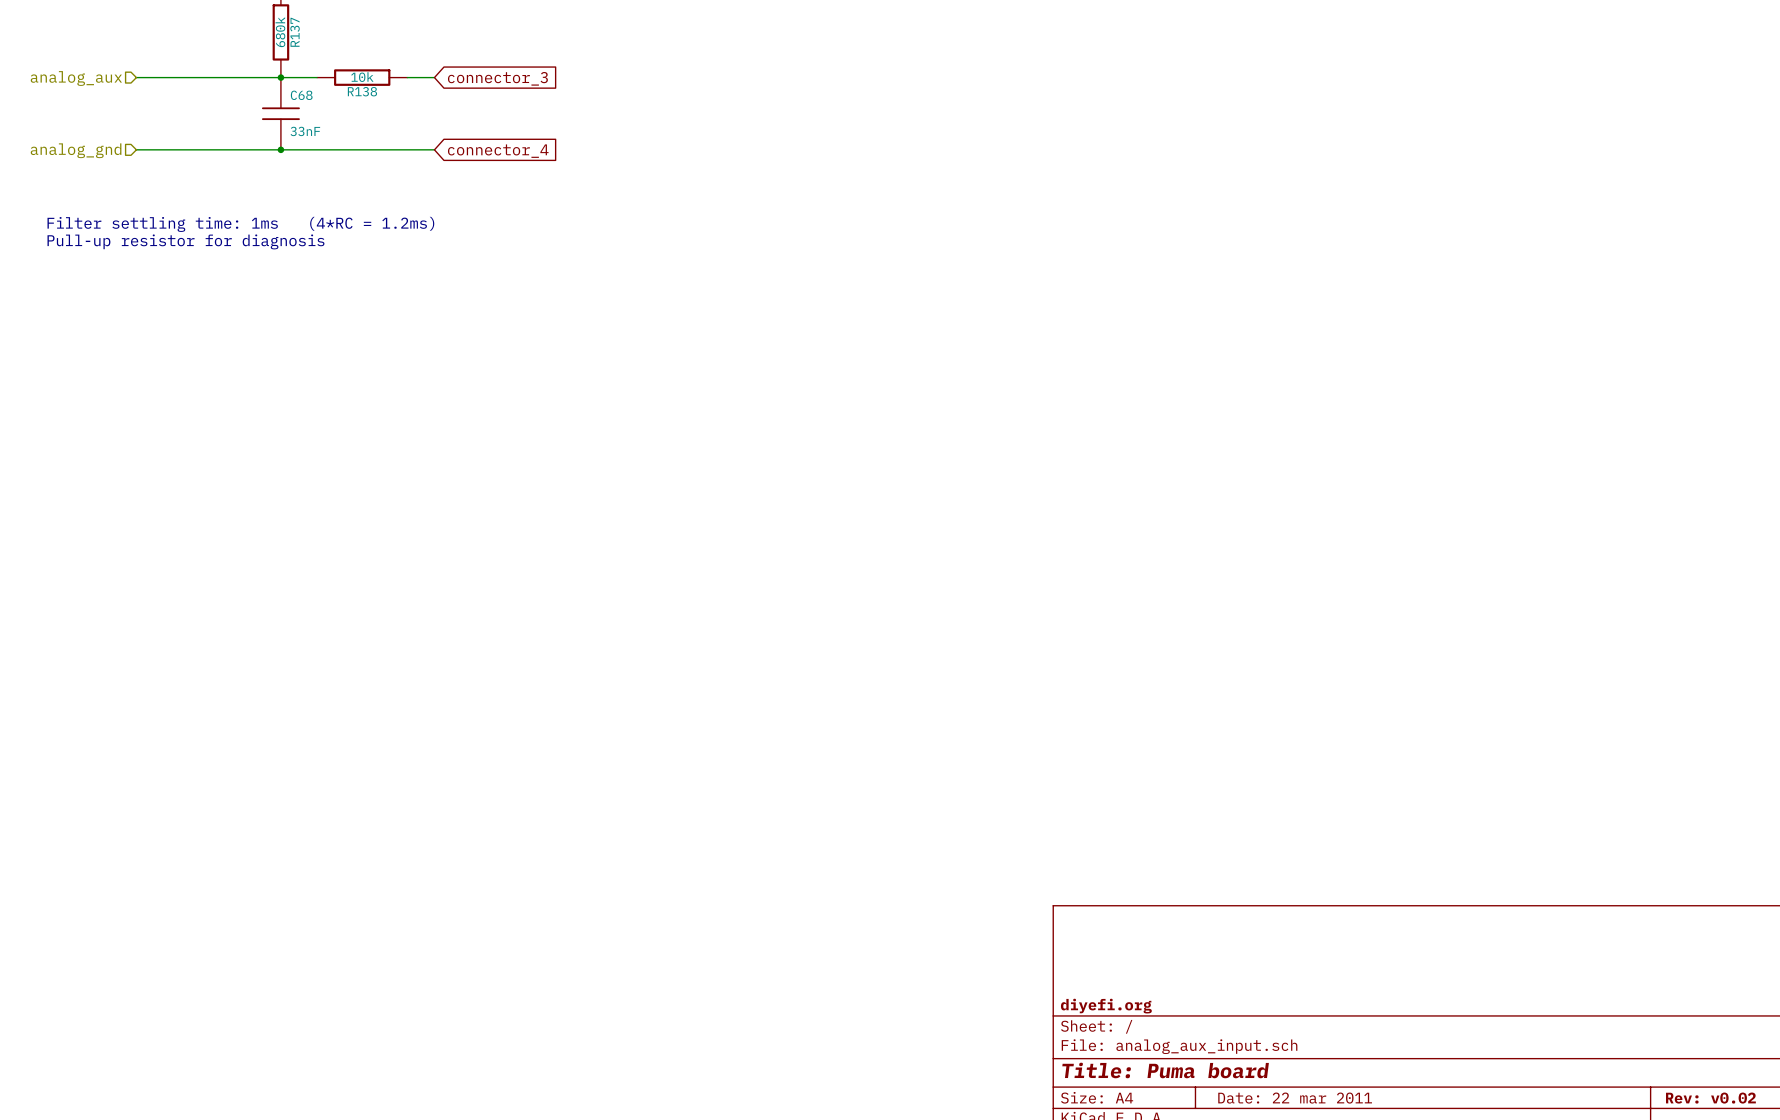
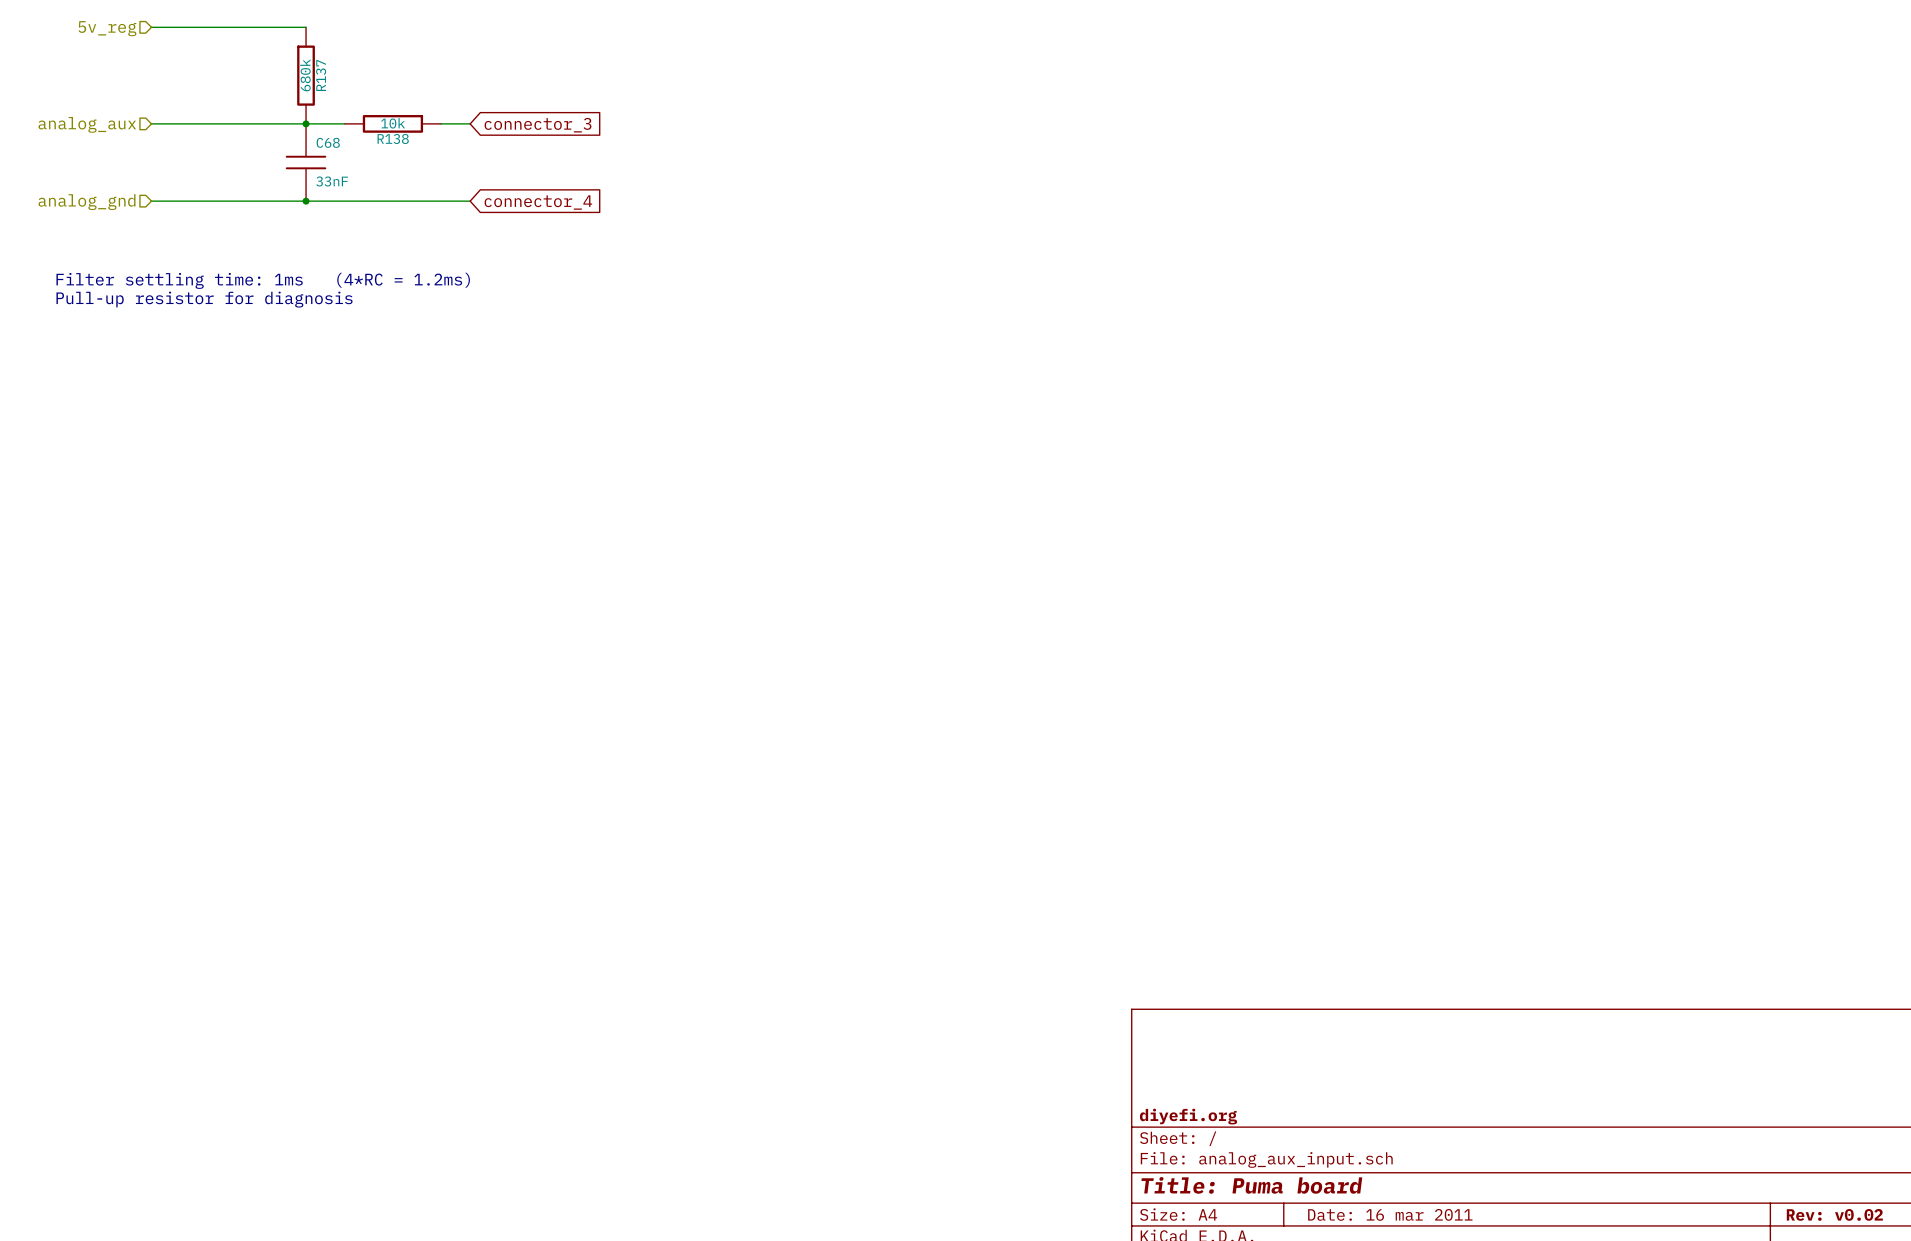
title block: Date: 22 mar 2011 (1295, 1098) -> Date: 16 mar 2011 (1390, 1214)

